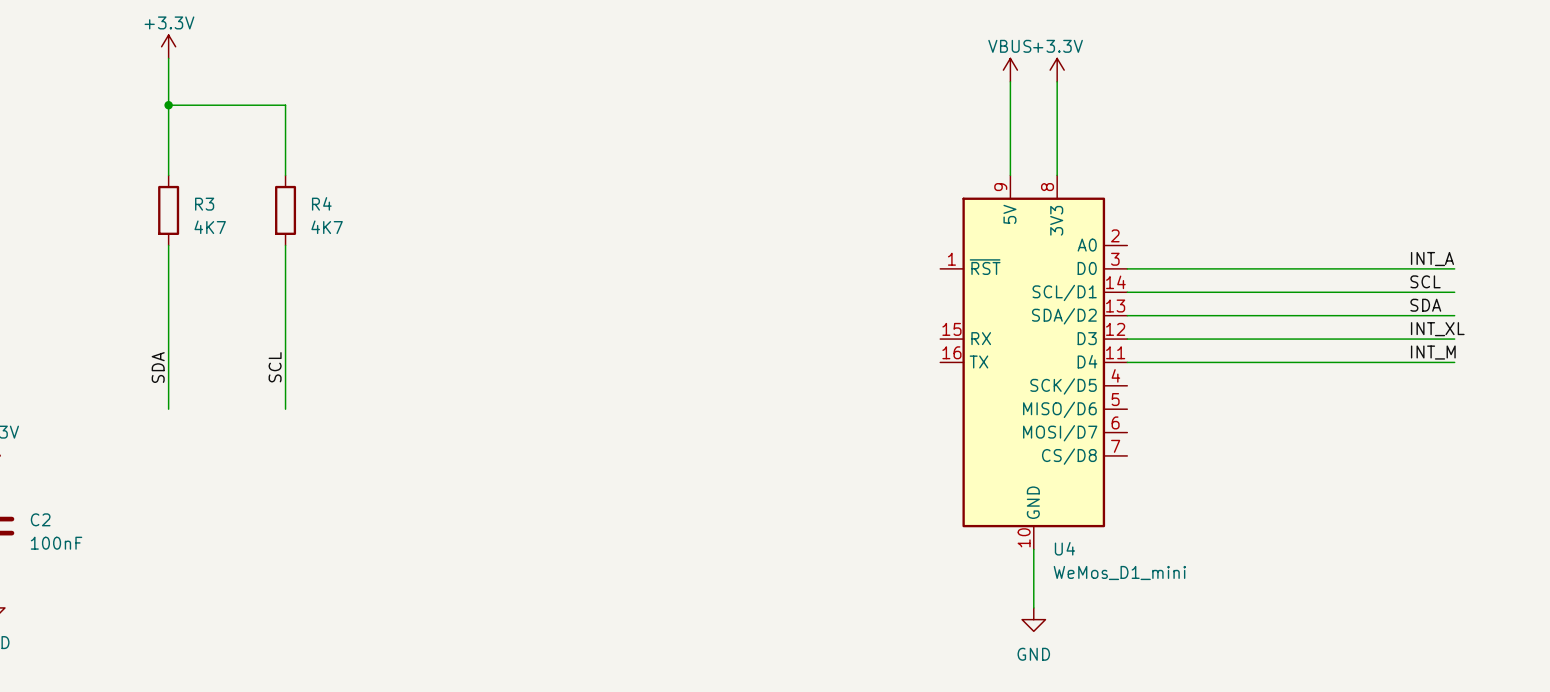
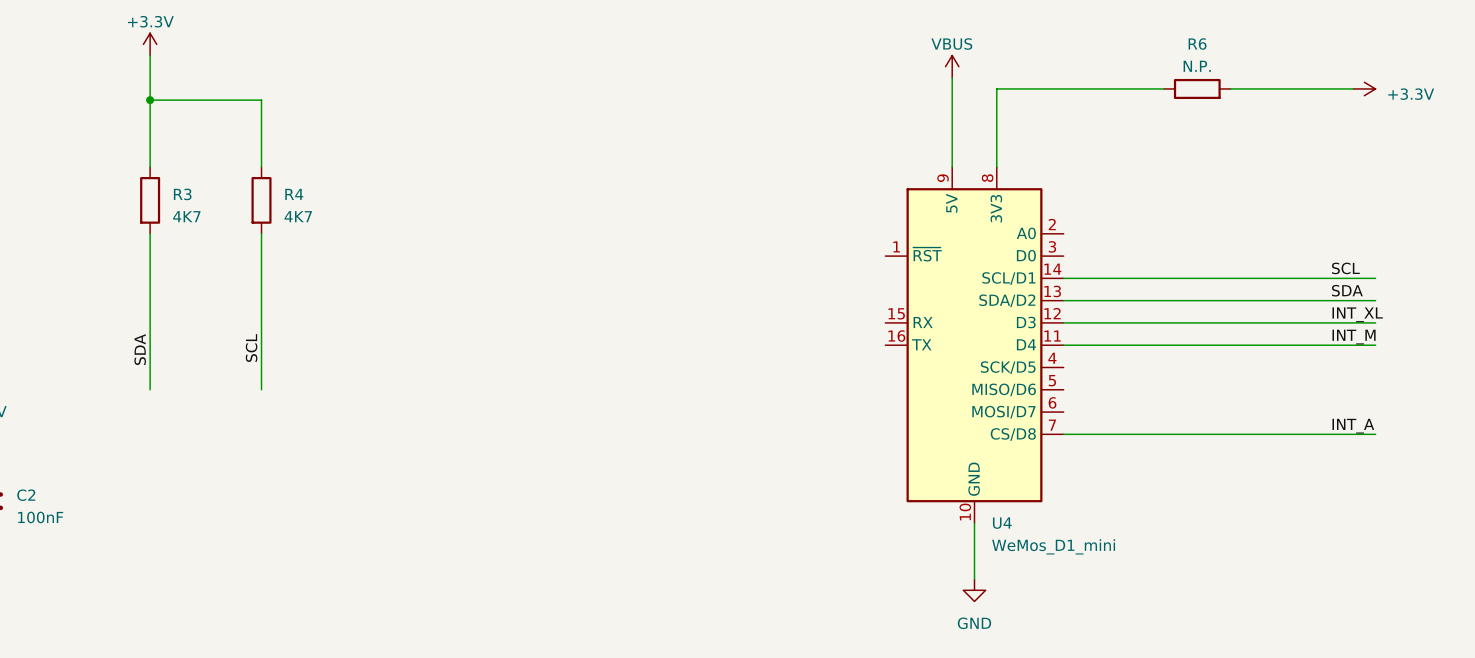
power symbol: +3.3V (1057, 70) -> none
wire: (1057, 81) (1057, 93) -> (1163, 88) (996, 88)
R6: none -> N.P. (1197, 88)
wire: none -> (1230, 88) (1353, 88)
power symbol: none -> +3.3V (1364, 88)
label position: INT_A (1432, 259) -> INT_A (1353, 426)
wire: (1127, 268) (1454, 268) -> (1063, 434) (1375, 434)

